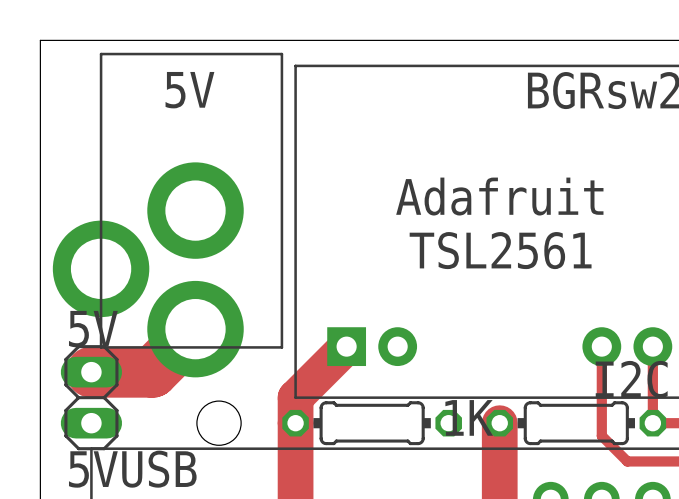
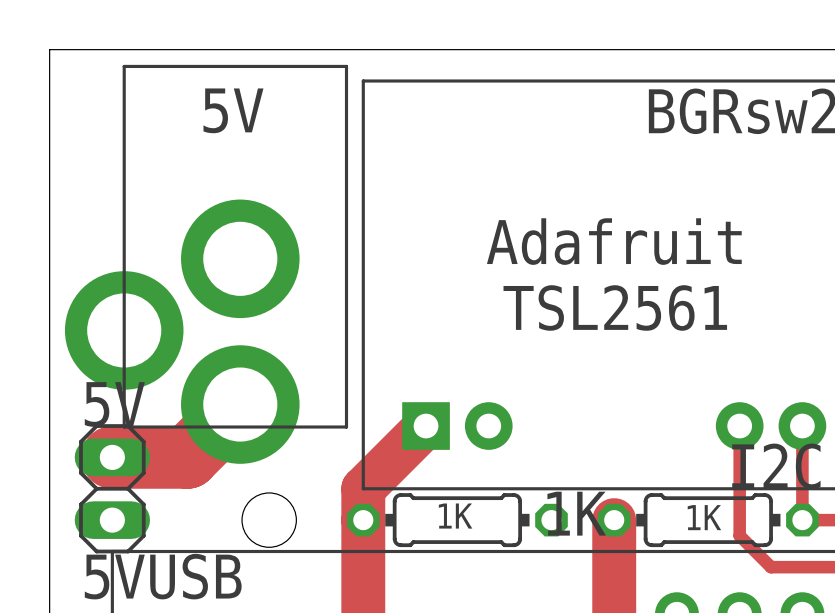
text: none -> 1K (455, 516)
text: none -> 1K (704, 517)

